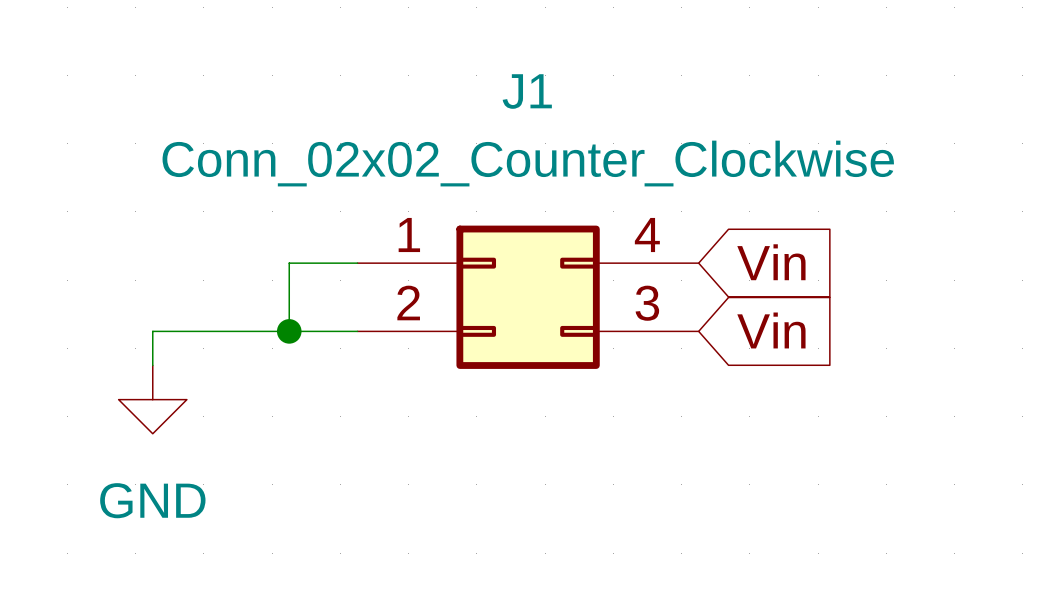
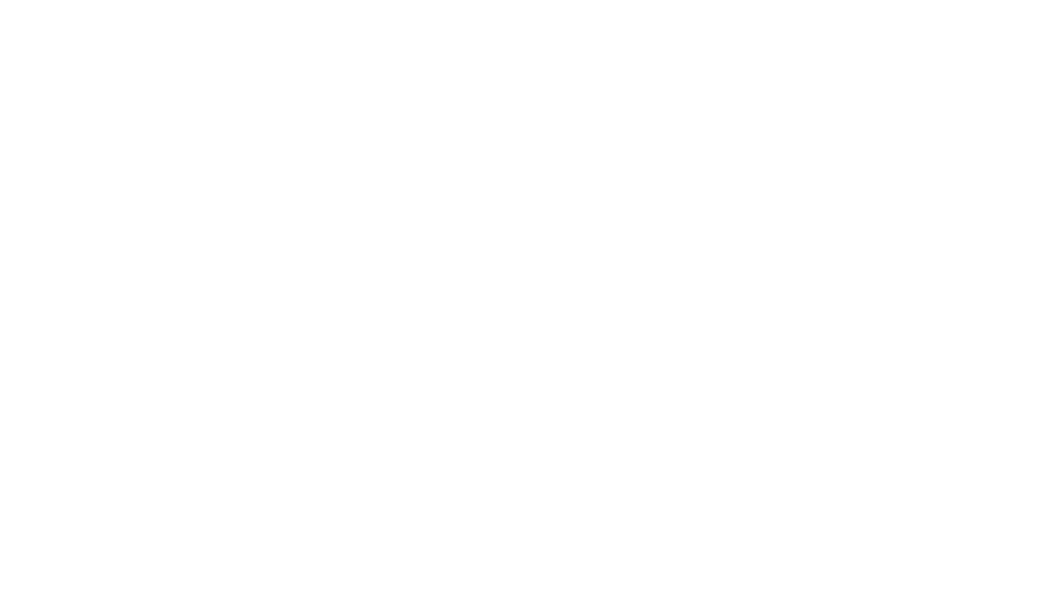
global label: Vin (771, 262) -> none
wire: (357, 263) (289, 263) (289, 331) -> none
J1: Conn_02x02_Counter_Clockwise (528, 297) -> none
global label: Vin (771, 330) -> none
junction: (289, 331) -> none
wire: (357, 331) (152, 331) (152, 365) -> none
power symbol: GND (152, 399) -> none

